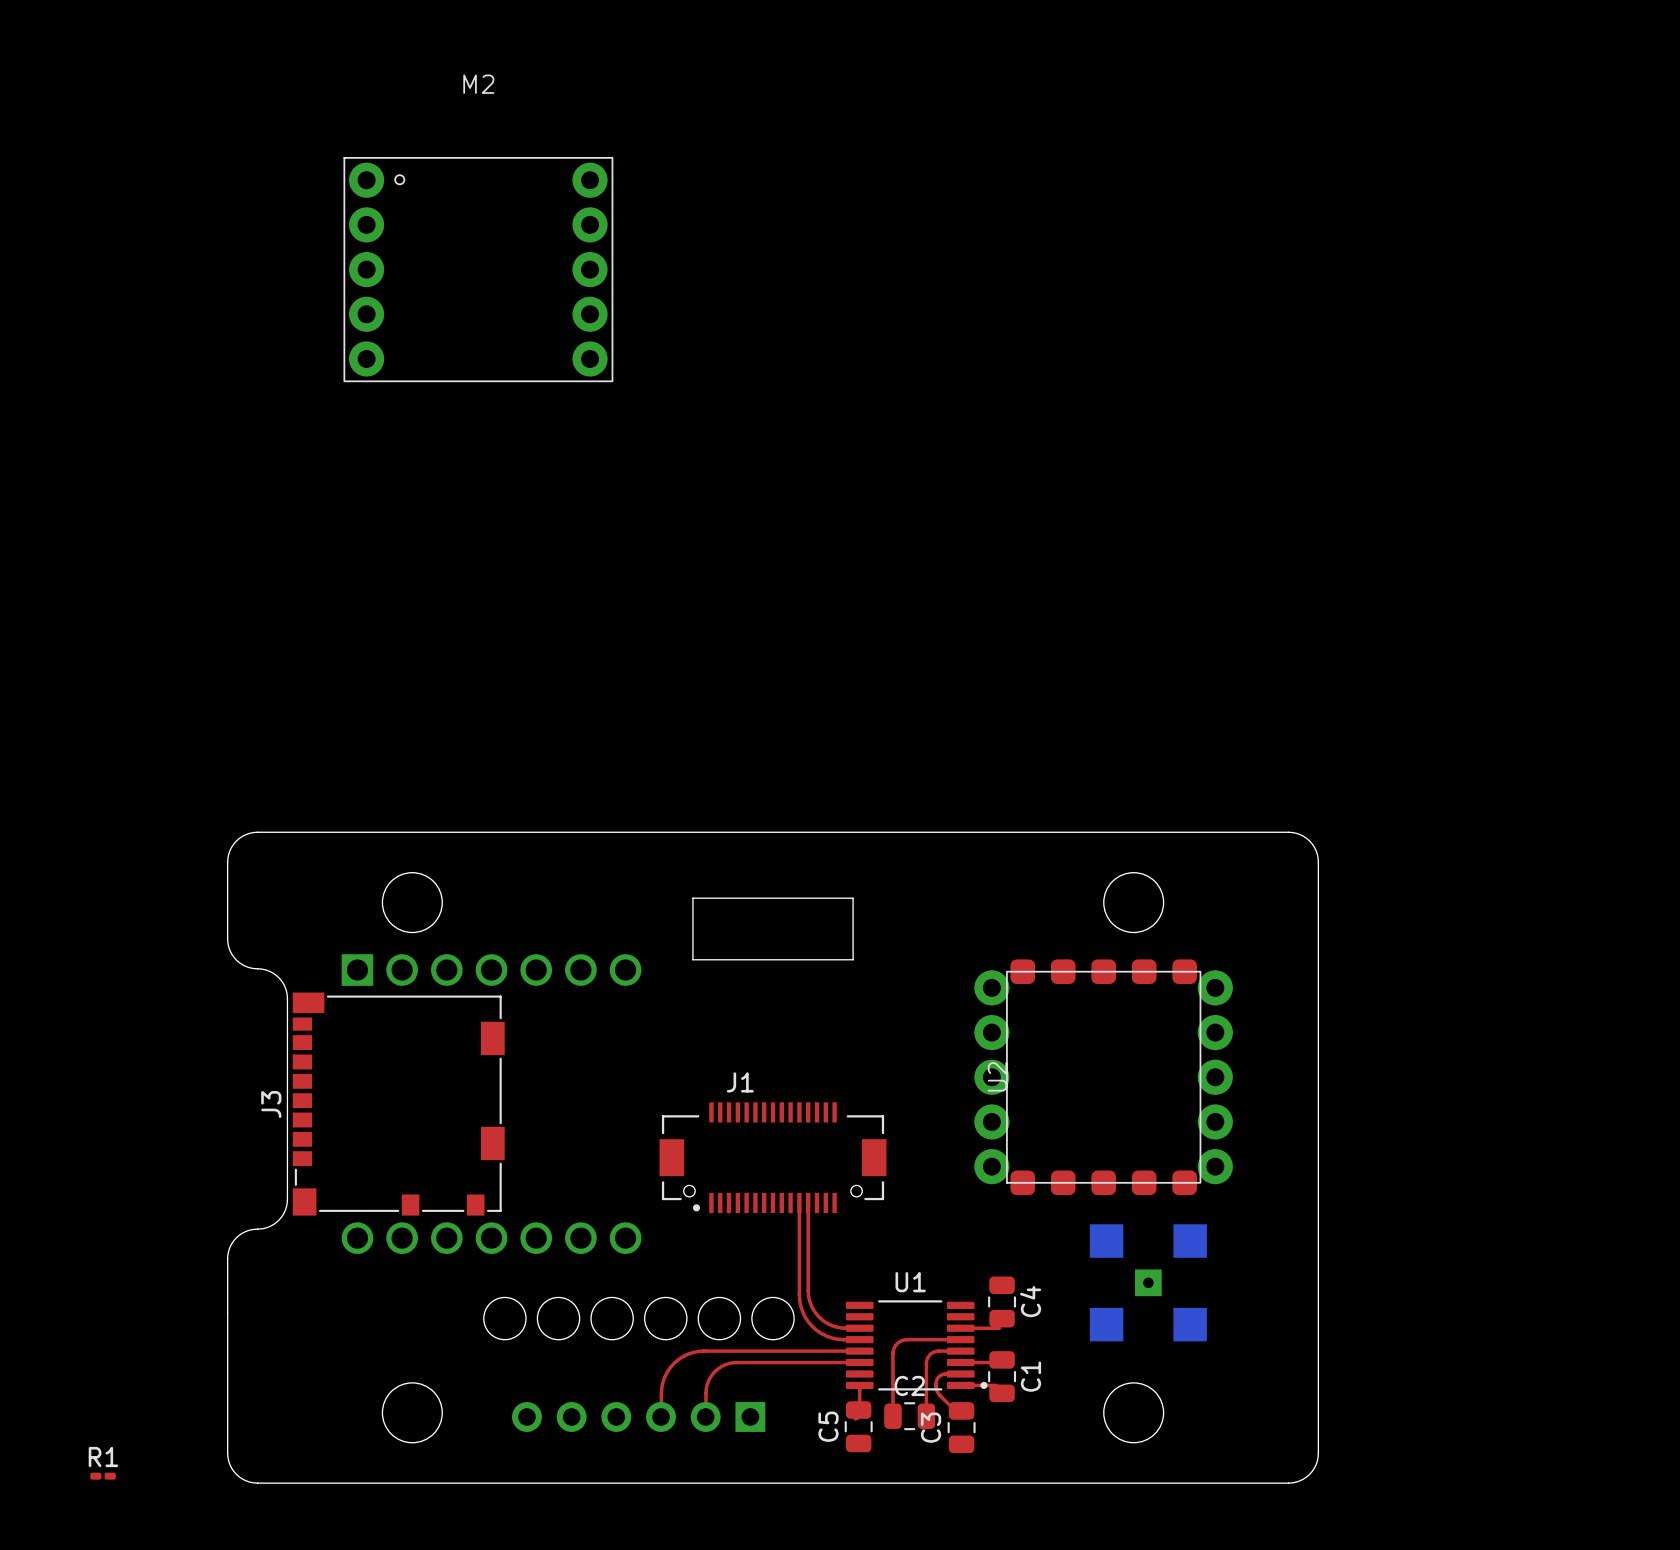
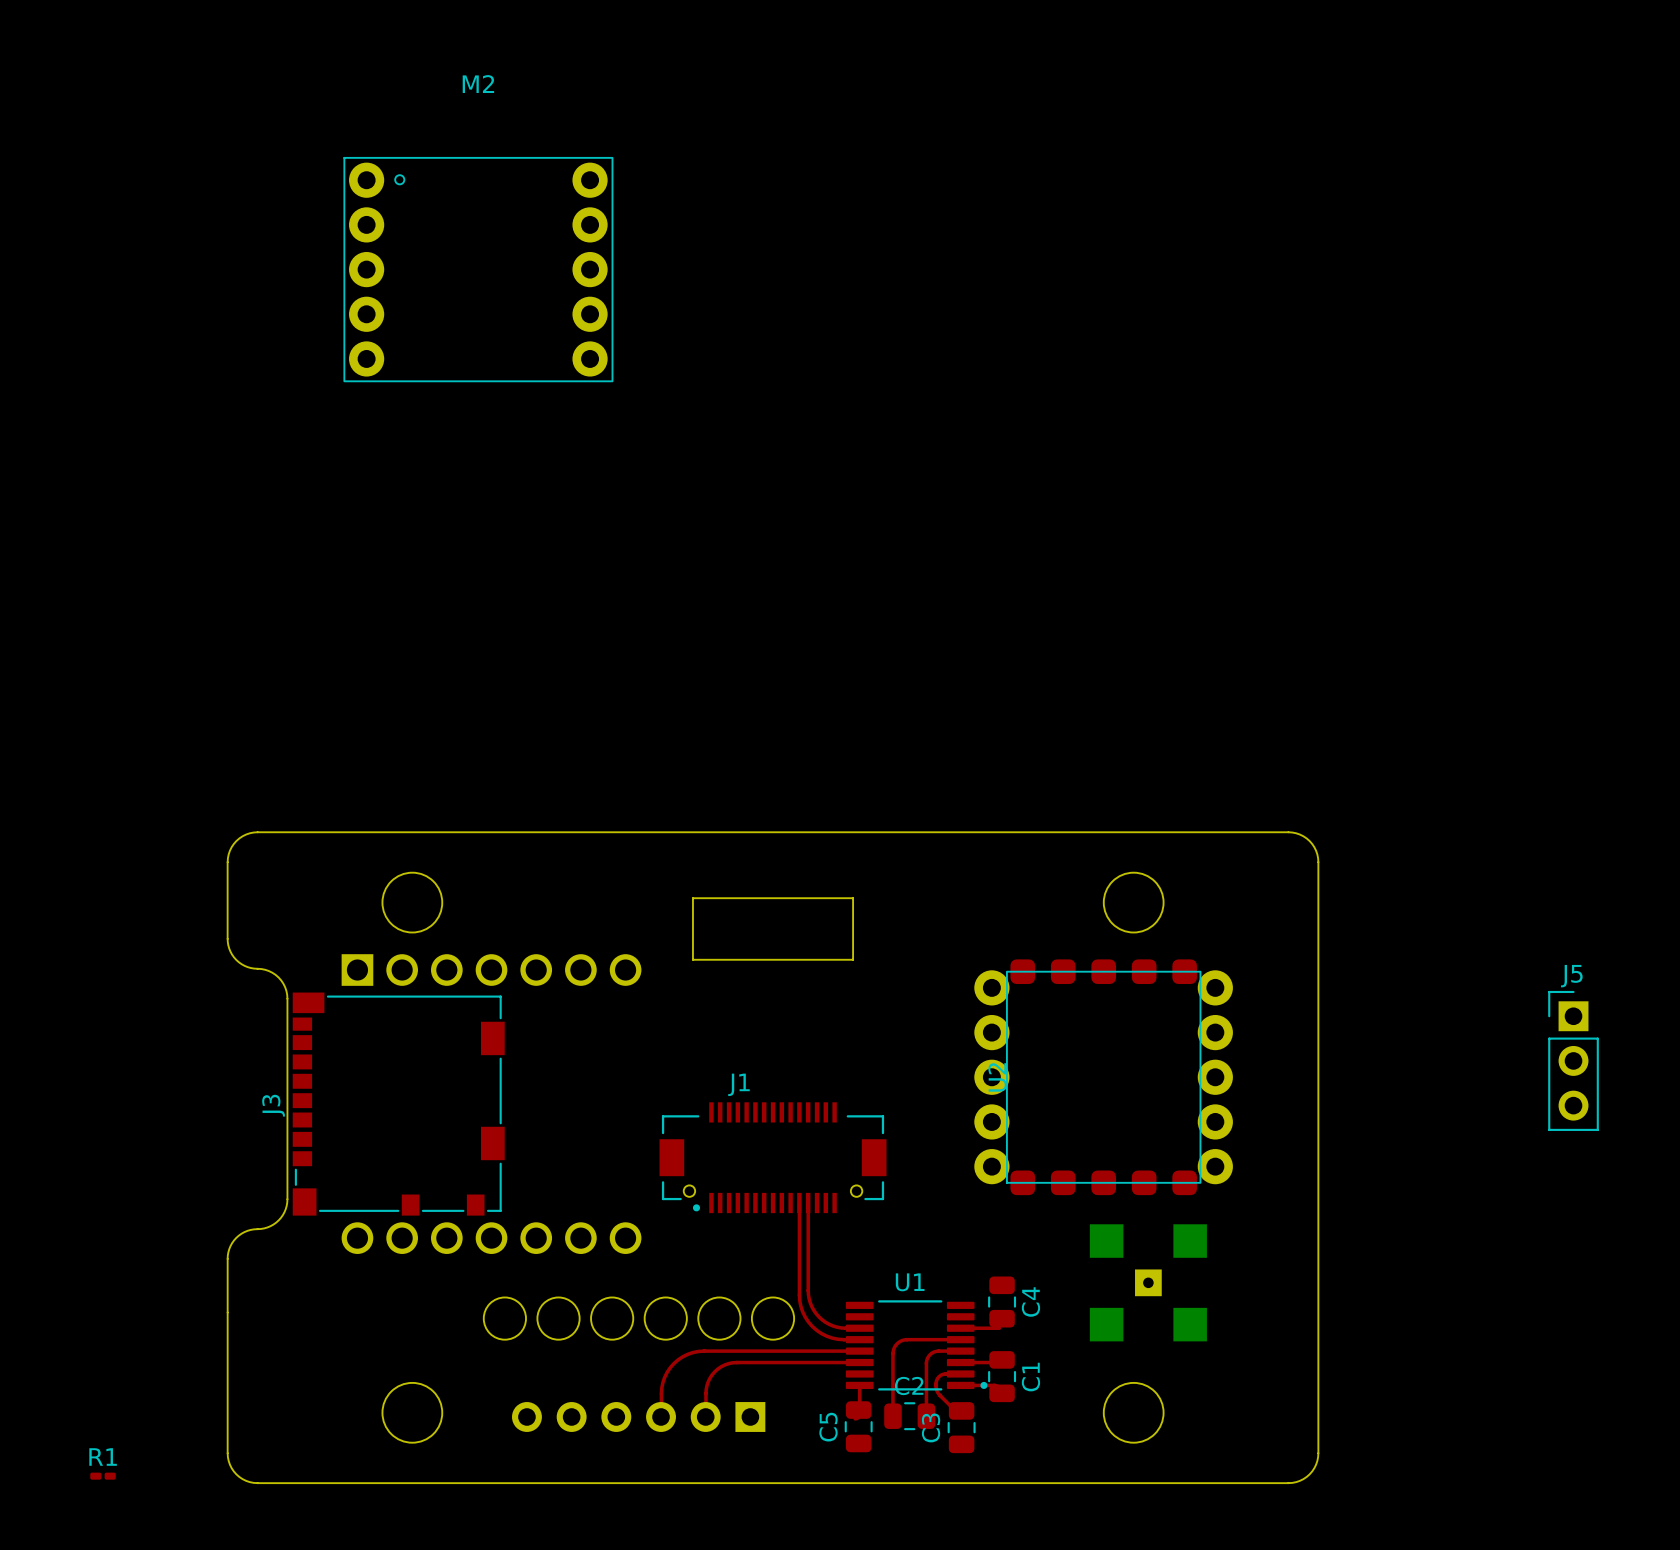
J5: none -> (1573, 1060)

